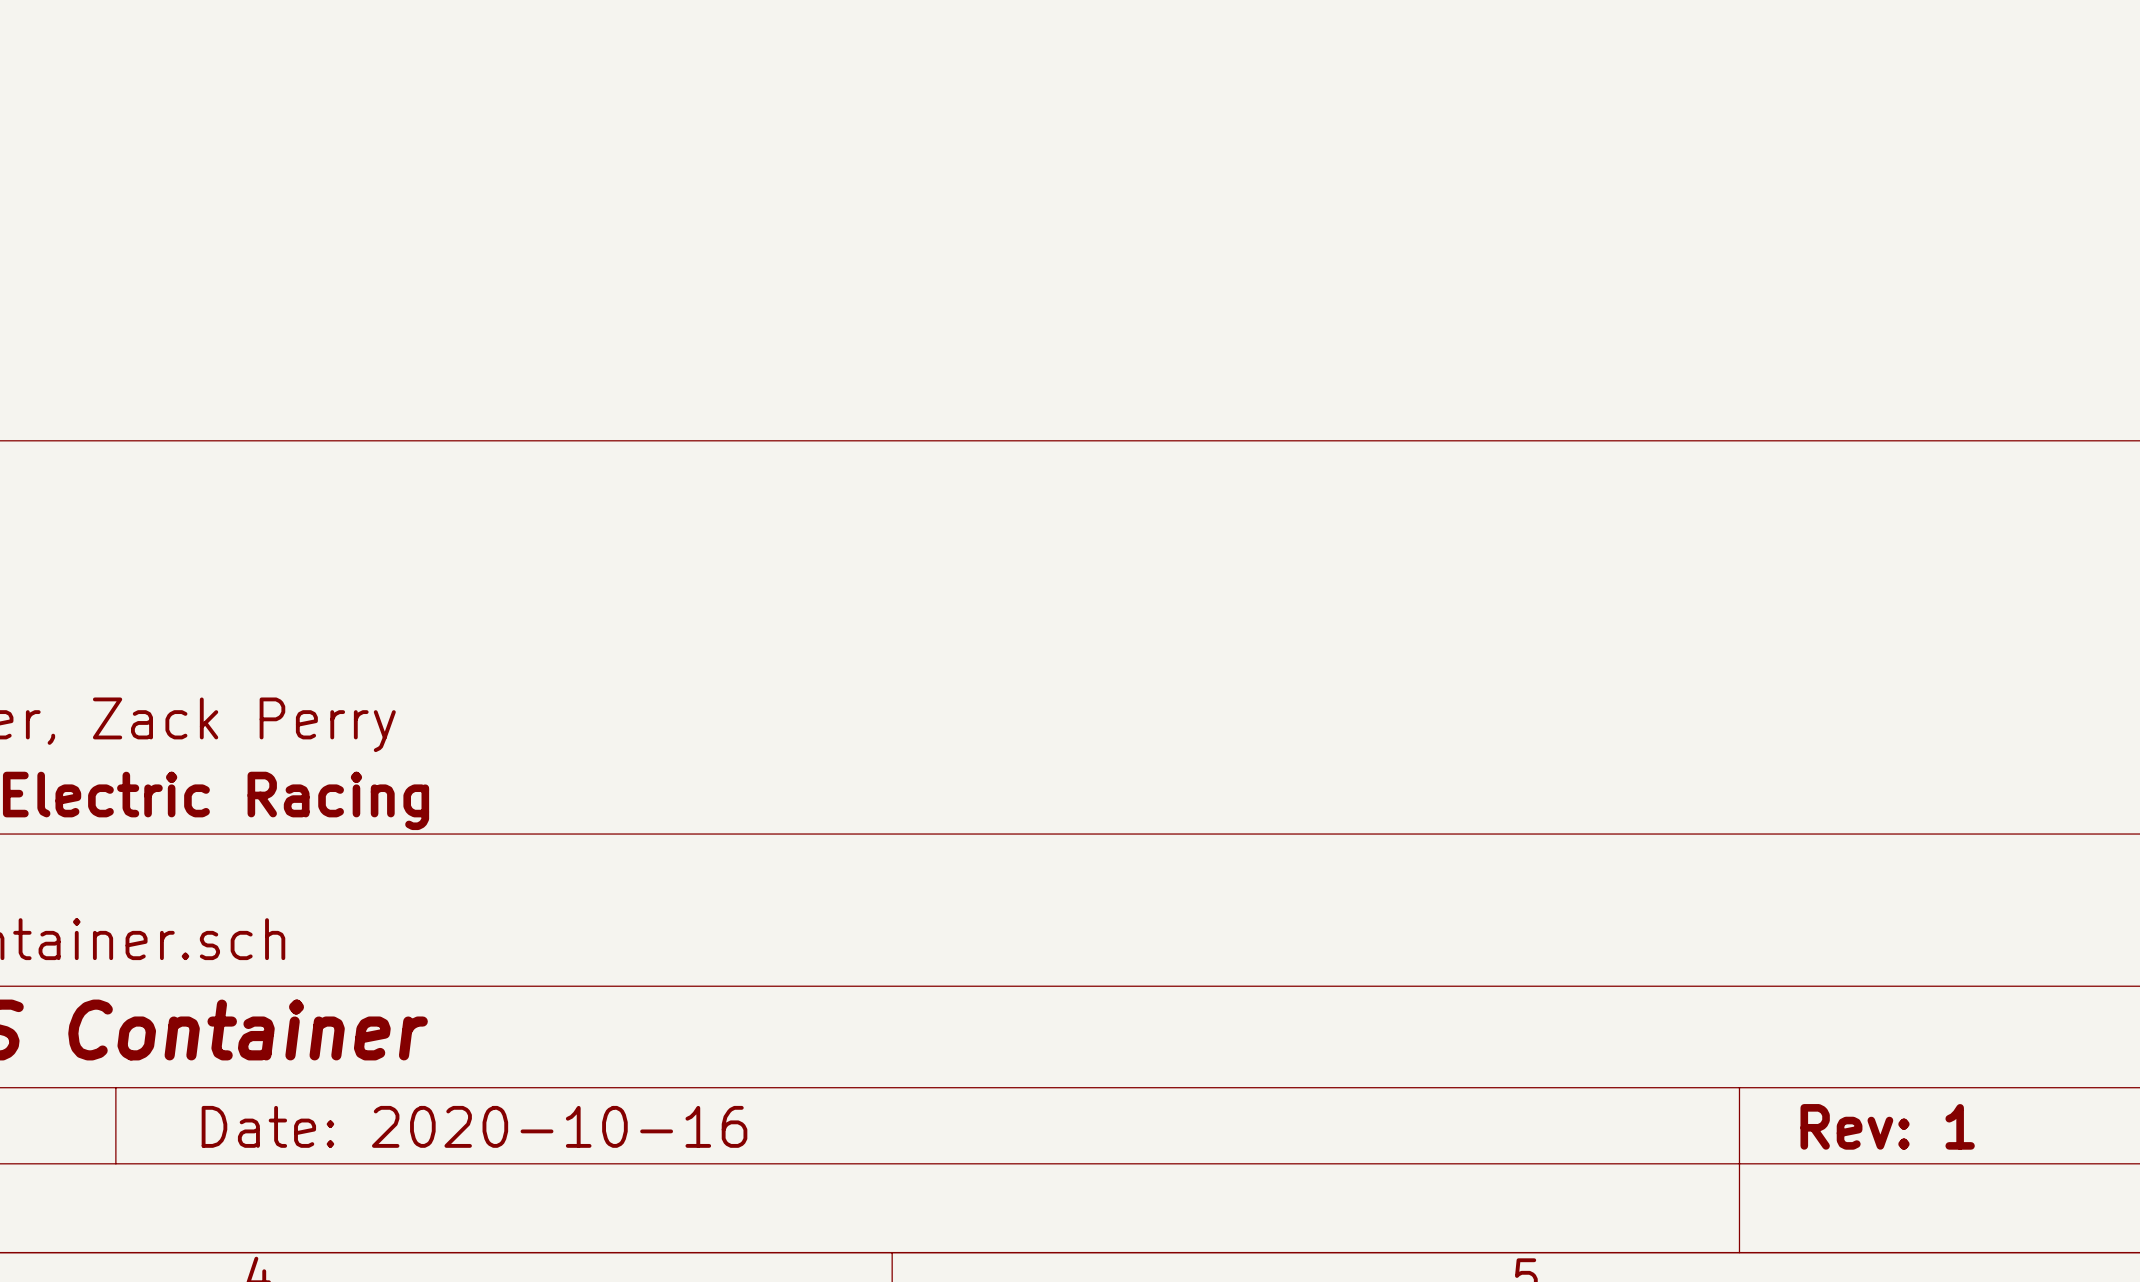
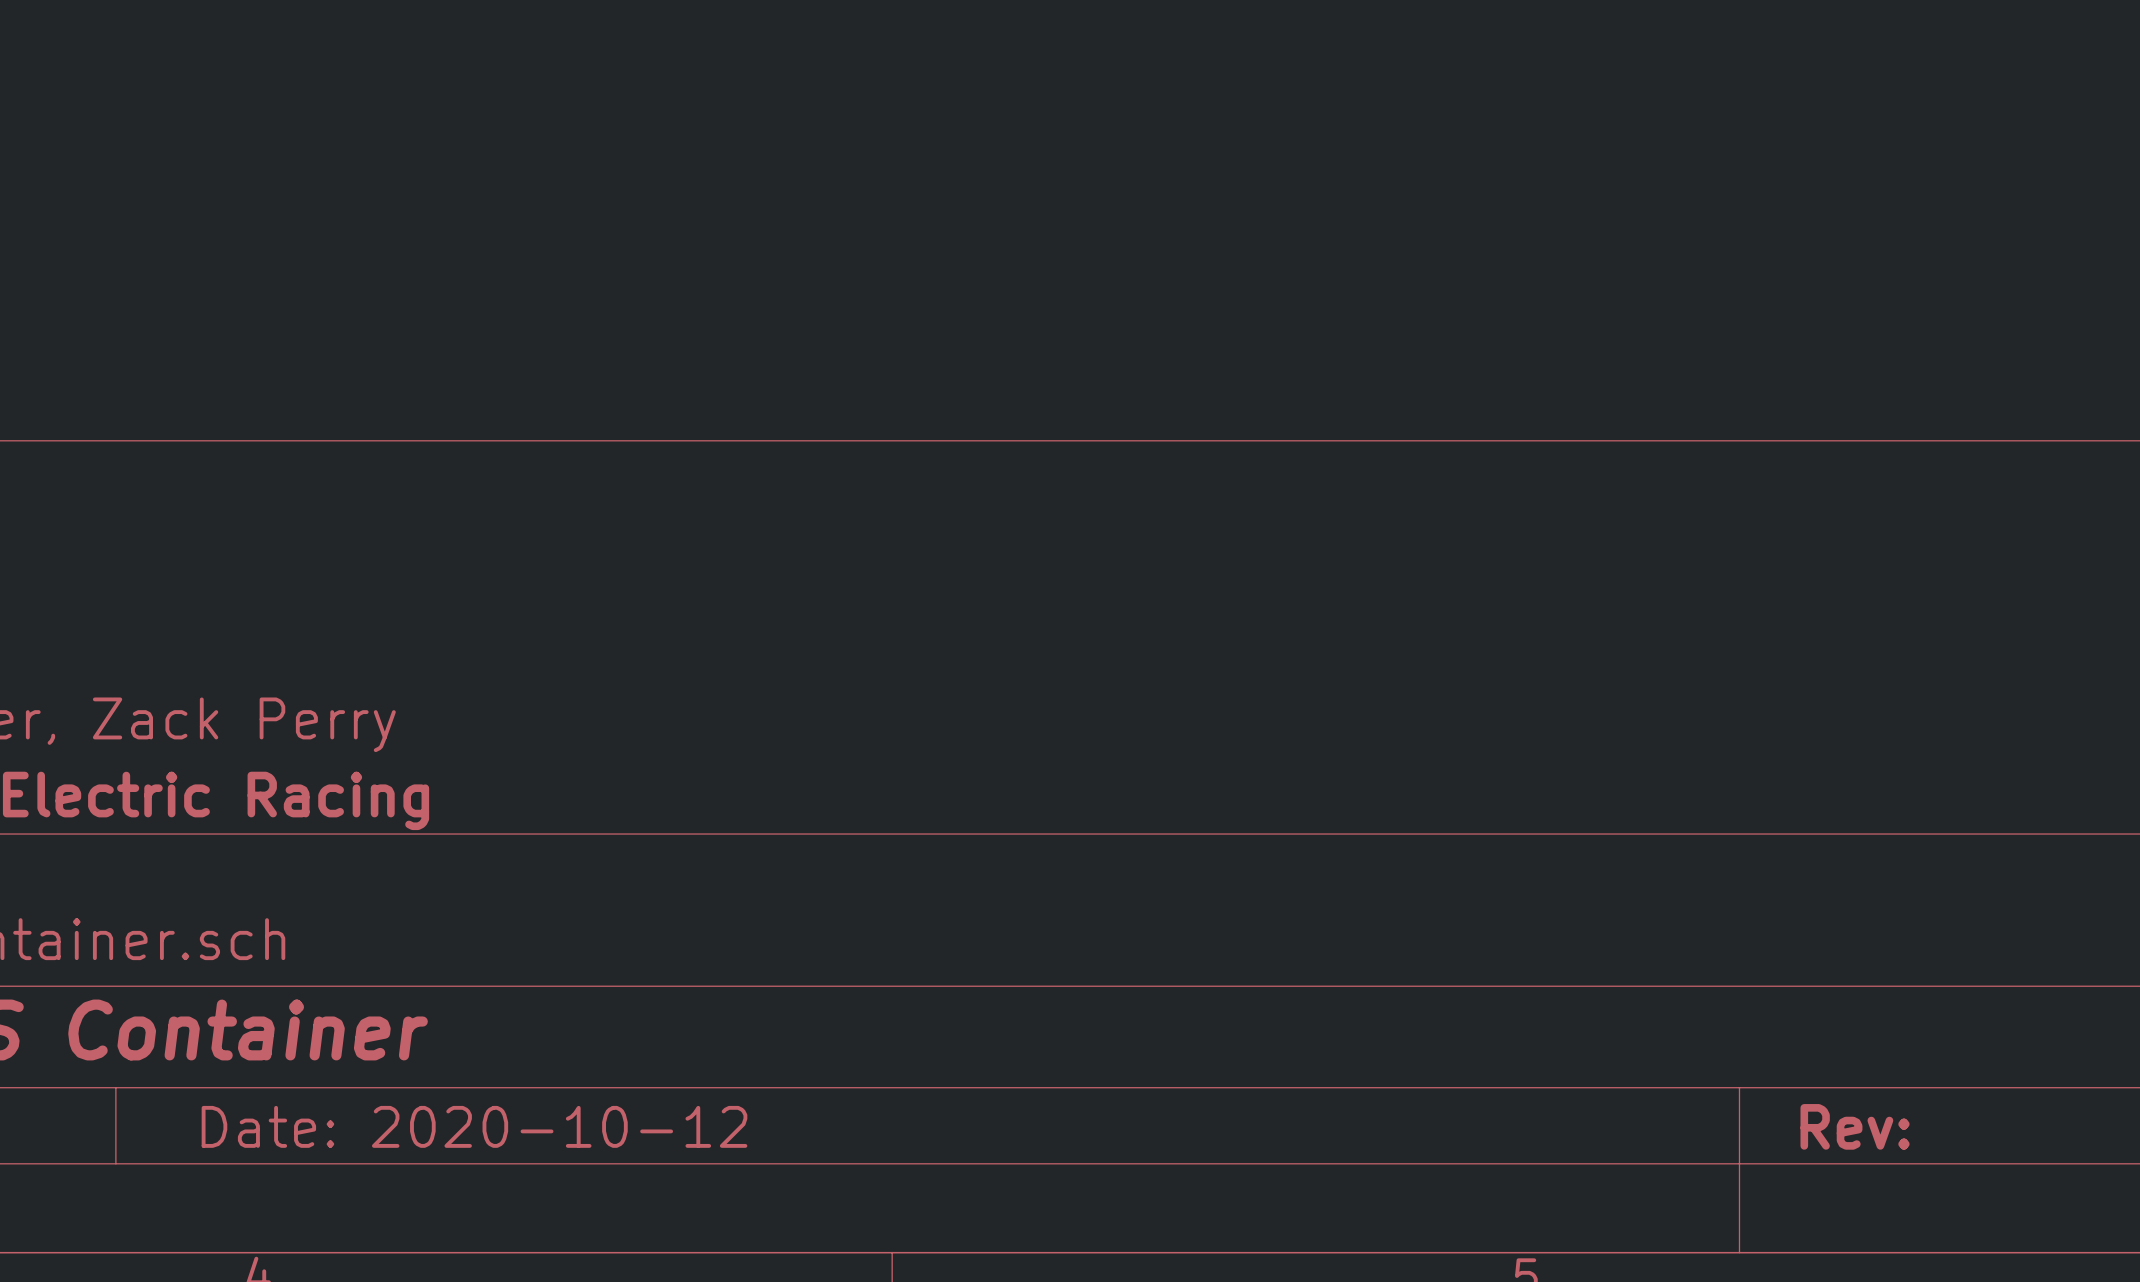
title block: Date: 2020-10-16 (474, 1126) -> Date: 2020-10-12 (474, 1126)
title block: Rev: 1 (1887, 1126) -> Rev: (1855, 1126)

